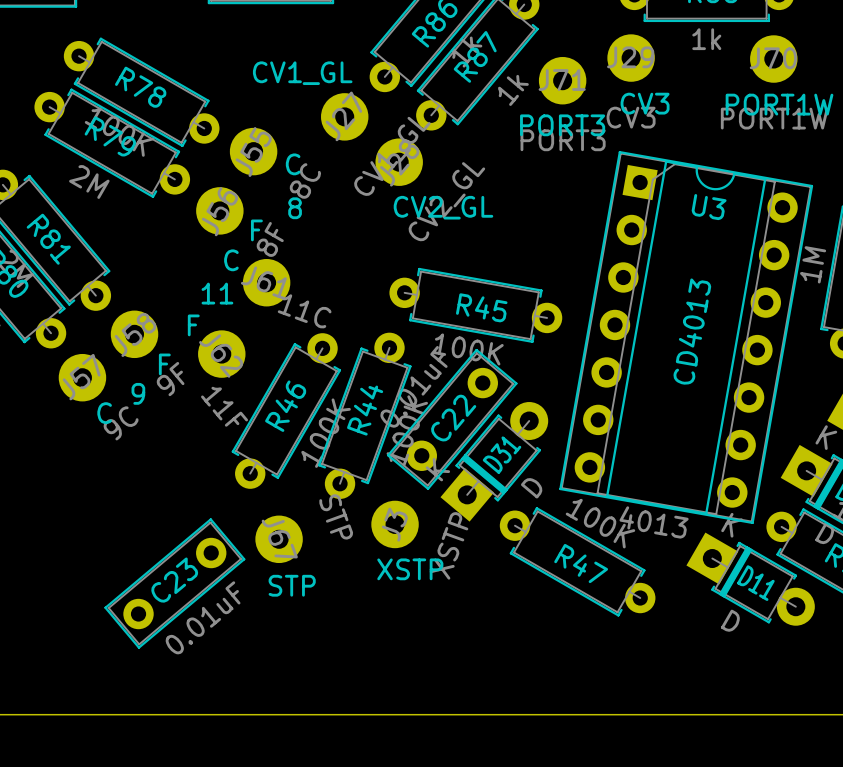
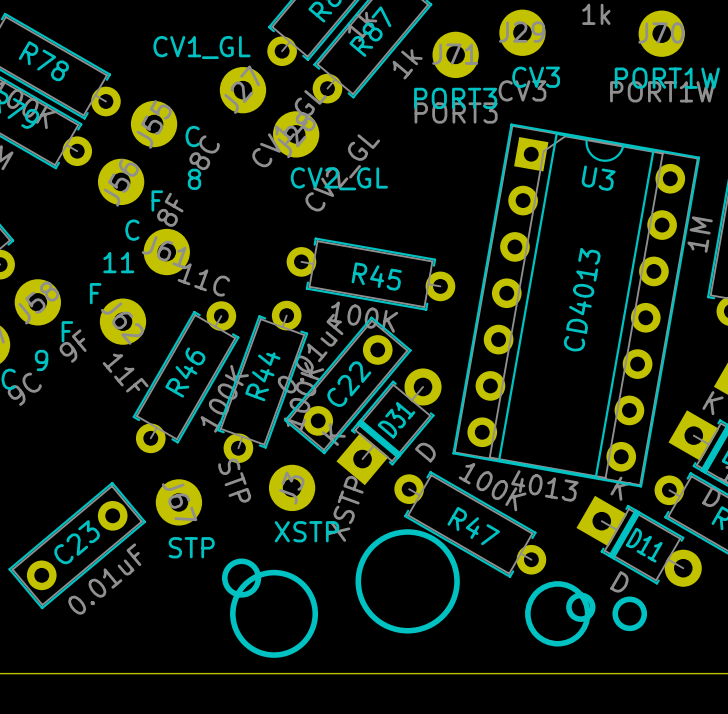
drawing: none -> [355, 529, 460, 634]
drawing: none -> [222, 558, 319, 658]
drawing: none -> [525, 581, 648, 647]

